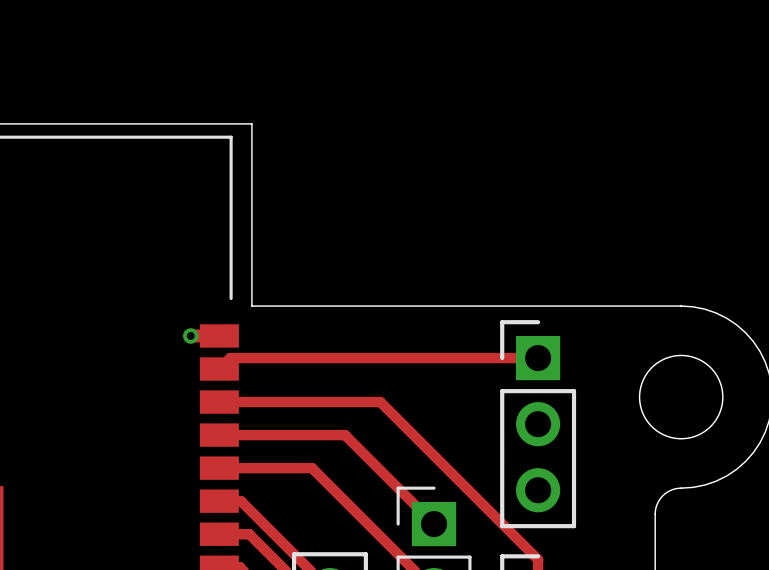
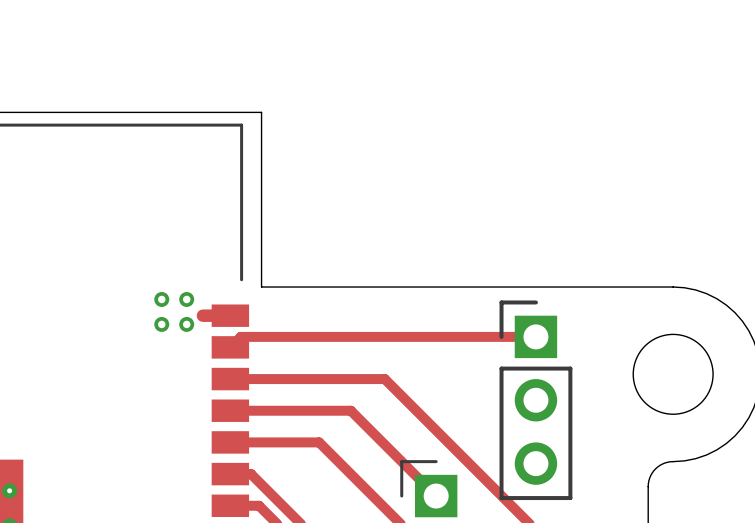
via: none -> (161, 299)
via: none -> (186, 299)
via: (190, 335) -> none
via: none -> (161, 324)
via: none -> (186, 324)

